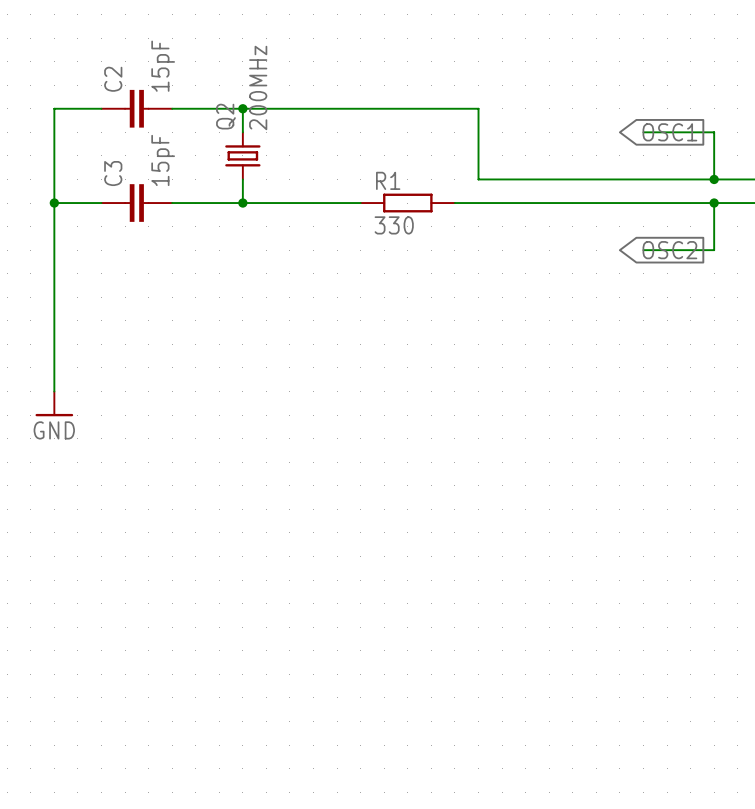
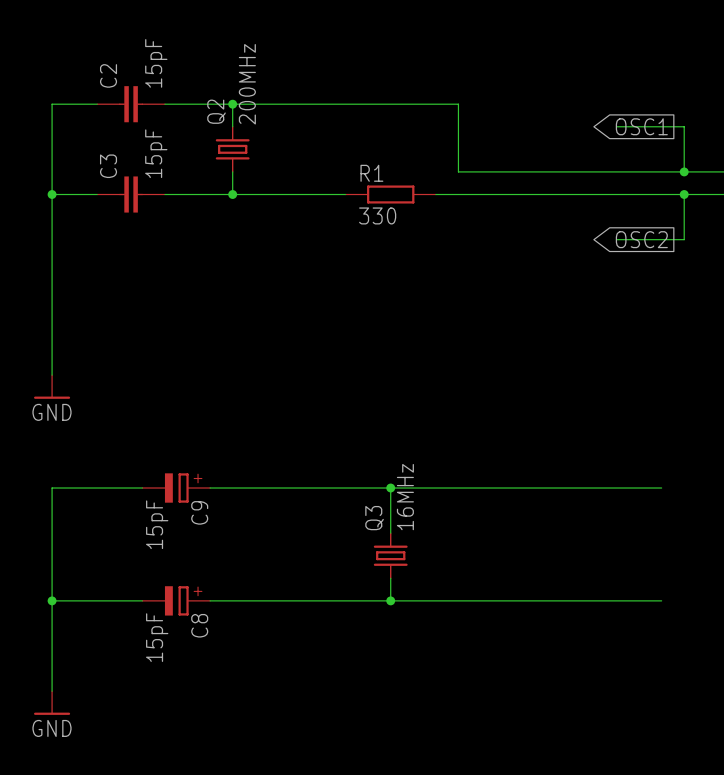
wire: none -> (142, 488) (52, 488) (52, 691)
C9: none -> 15pF (176, 488)
wire: none -> (210, 488) (661, 488)
wire: none -> (390, 488) (390, 533)
junction: none -> (390, 488)
Q3: none -> 16MHz (390, 555)
wire: none -> (390, 578) (390, 600)
wire: none -> (52, 600) (142, 600)
junction: none -> (52, 600)
C8: none -> 15pF (176, 600)
wire: none -> (210, 600) (661, 600)
junction: none -> (390, 600)
power symbol: none -> GND (52, 703)

